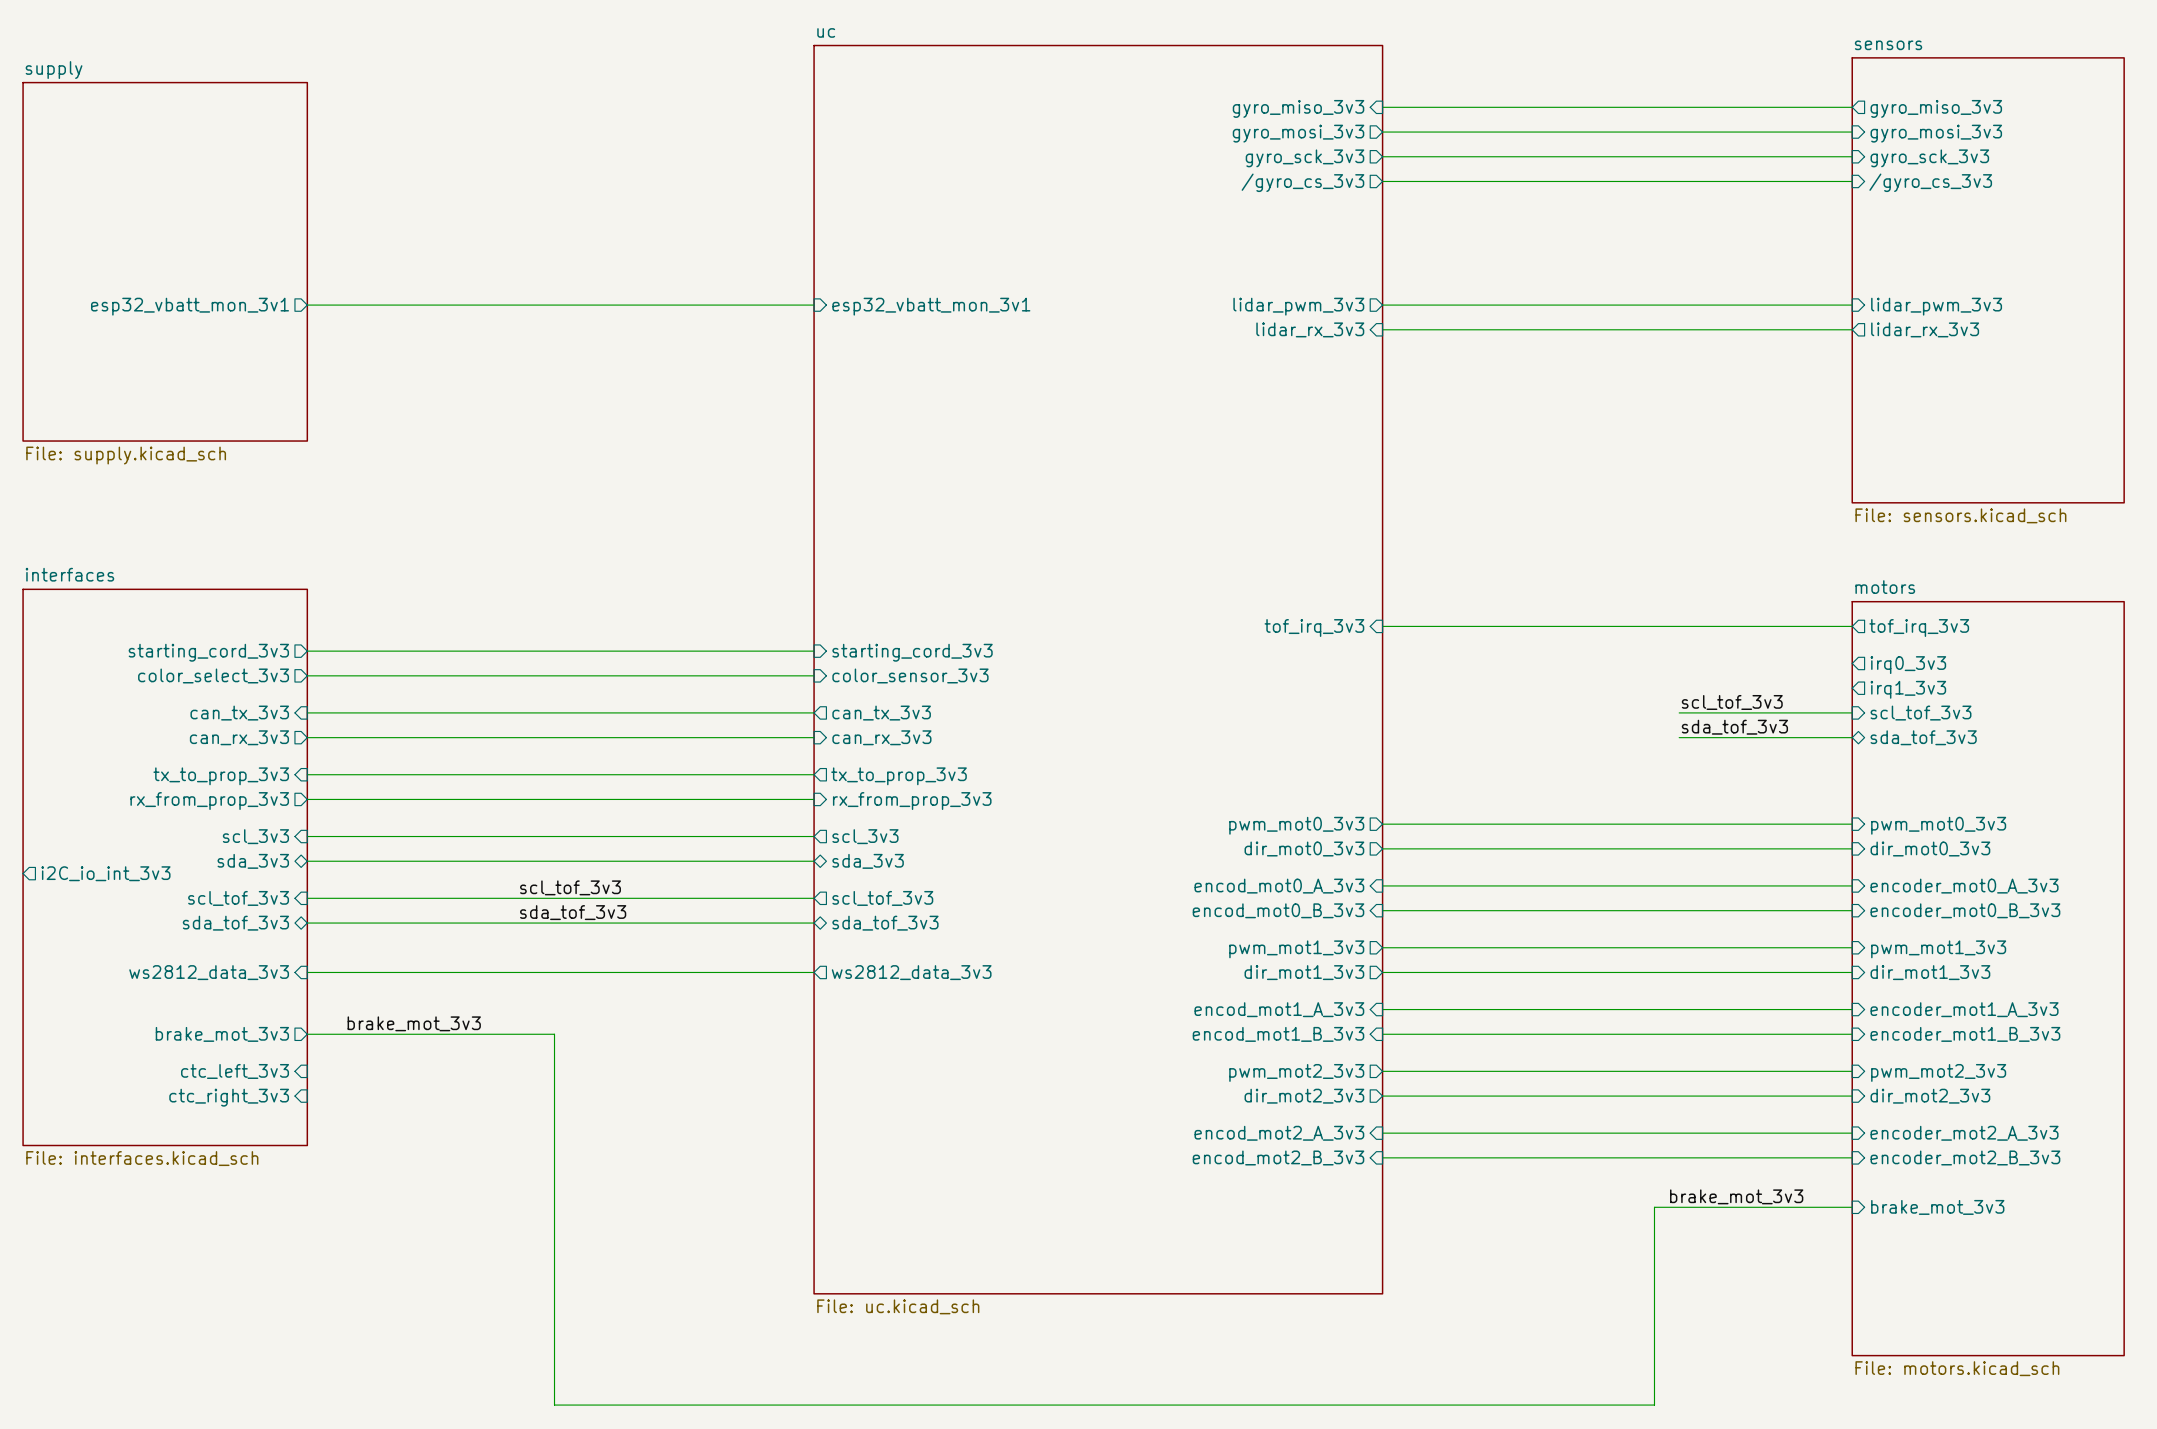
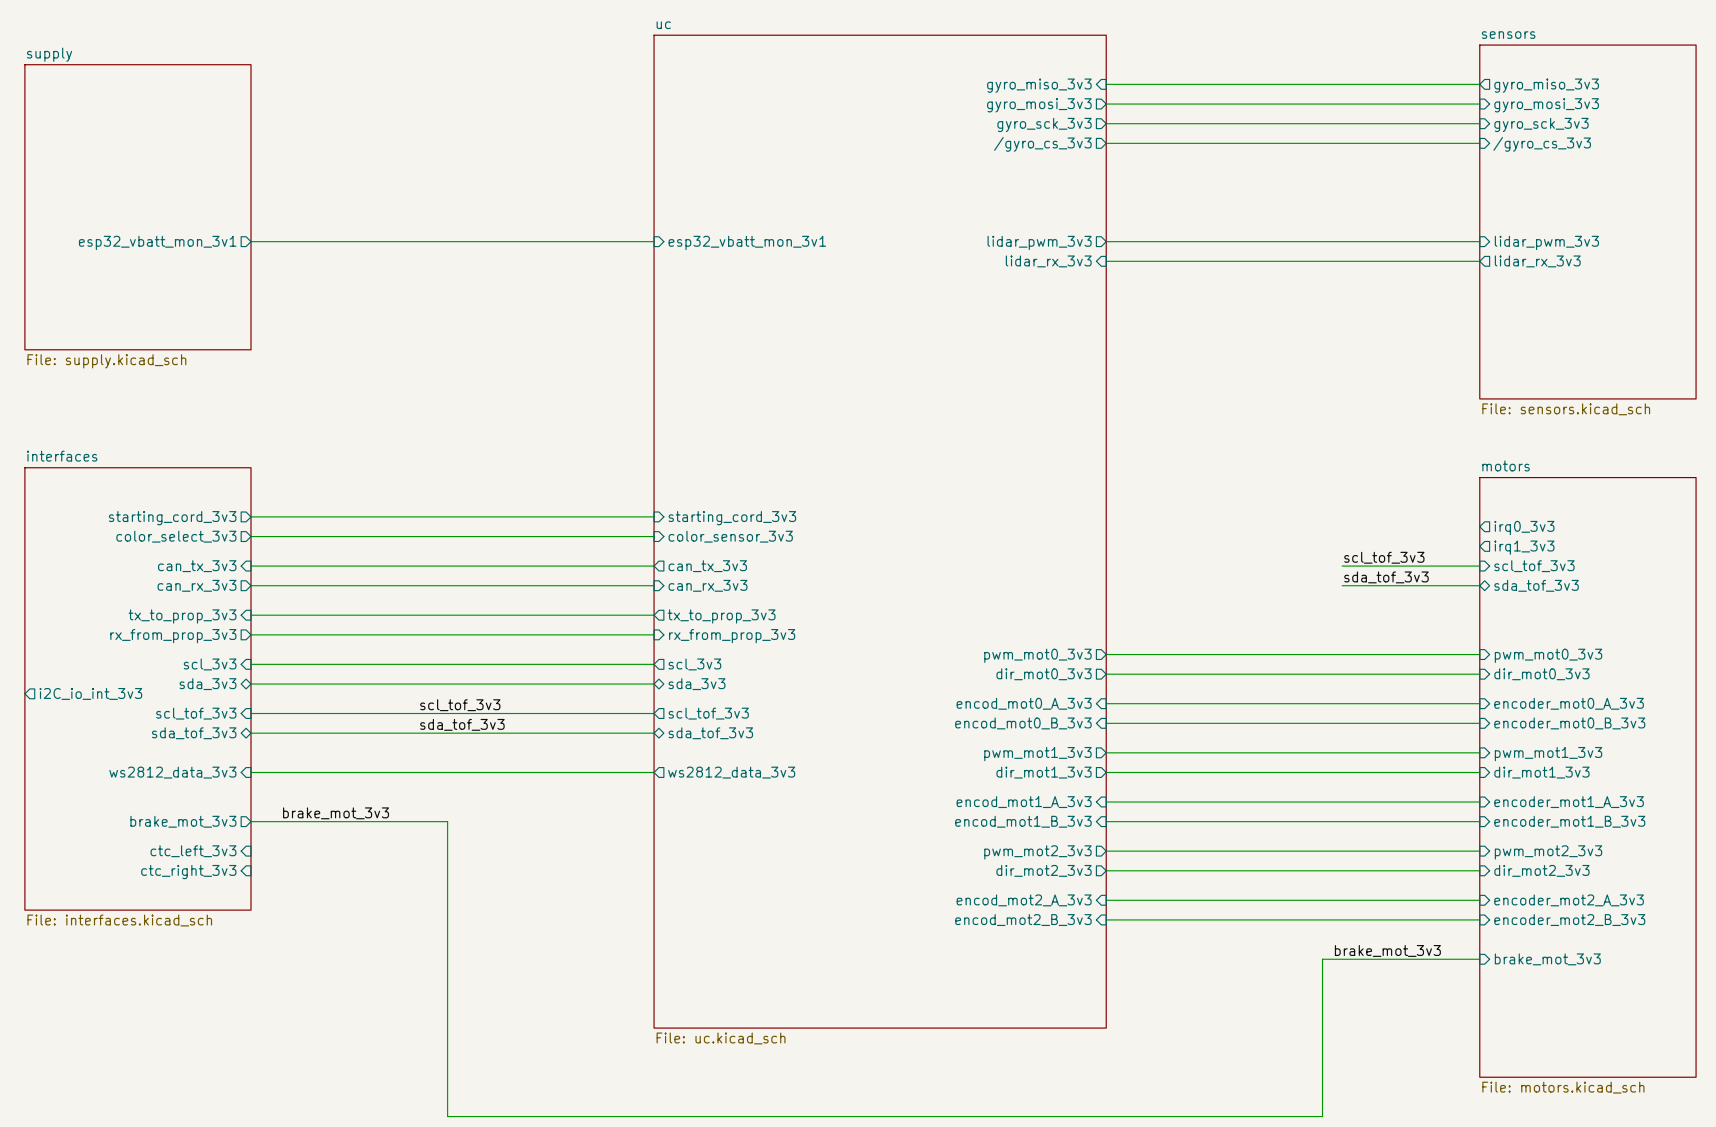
wire: (1382, 626) (1852, 626) -> none
sheet pin: tof_irq_3v3 (1314, 628) -> none
sheet pin: tof_irq_3v3 (1919, 628) -> none

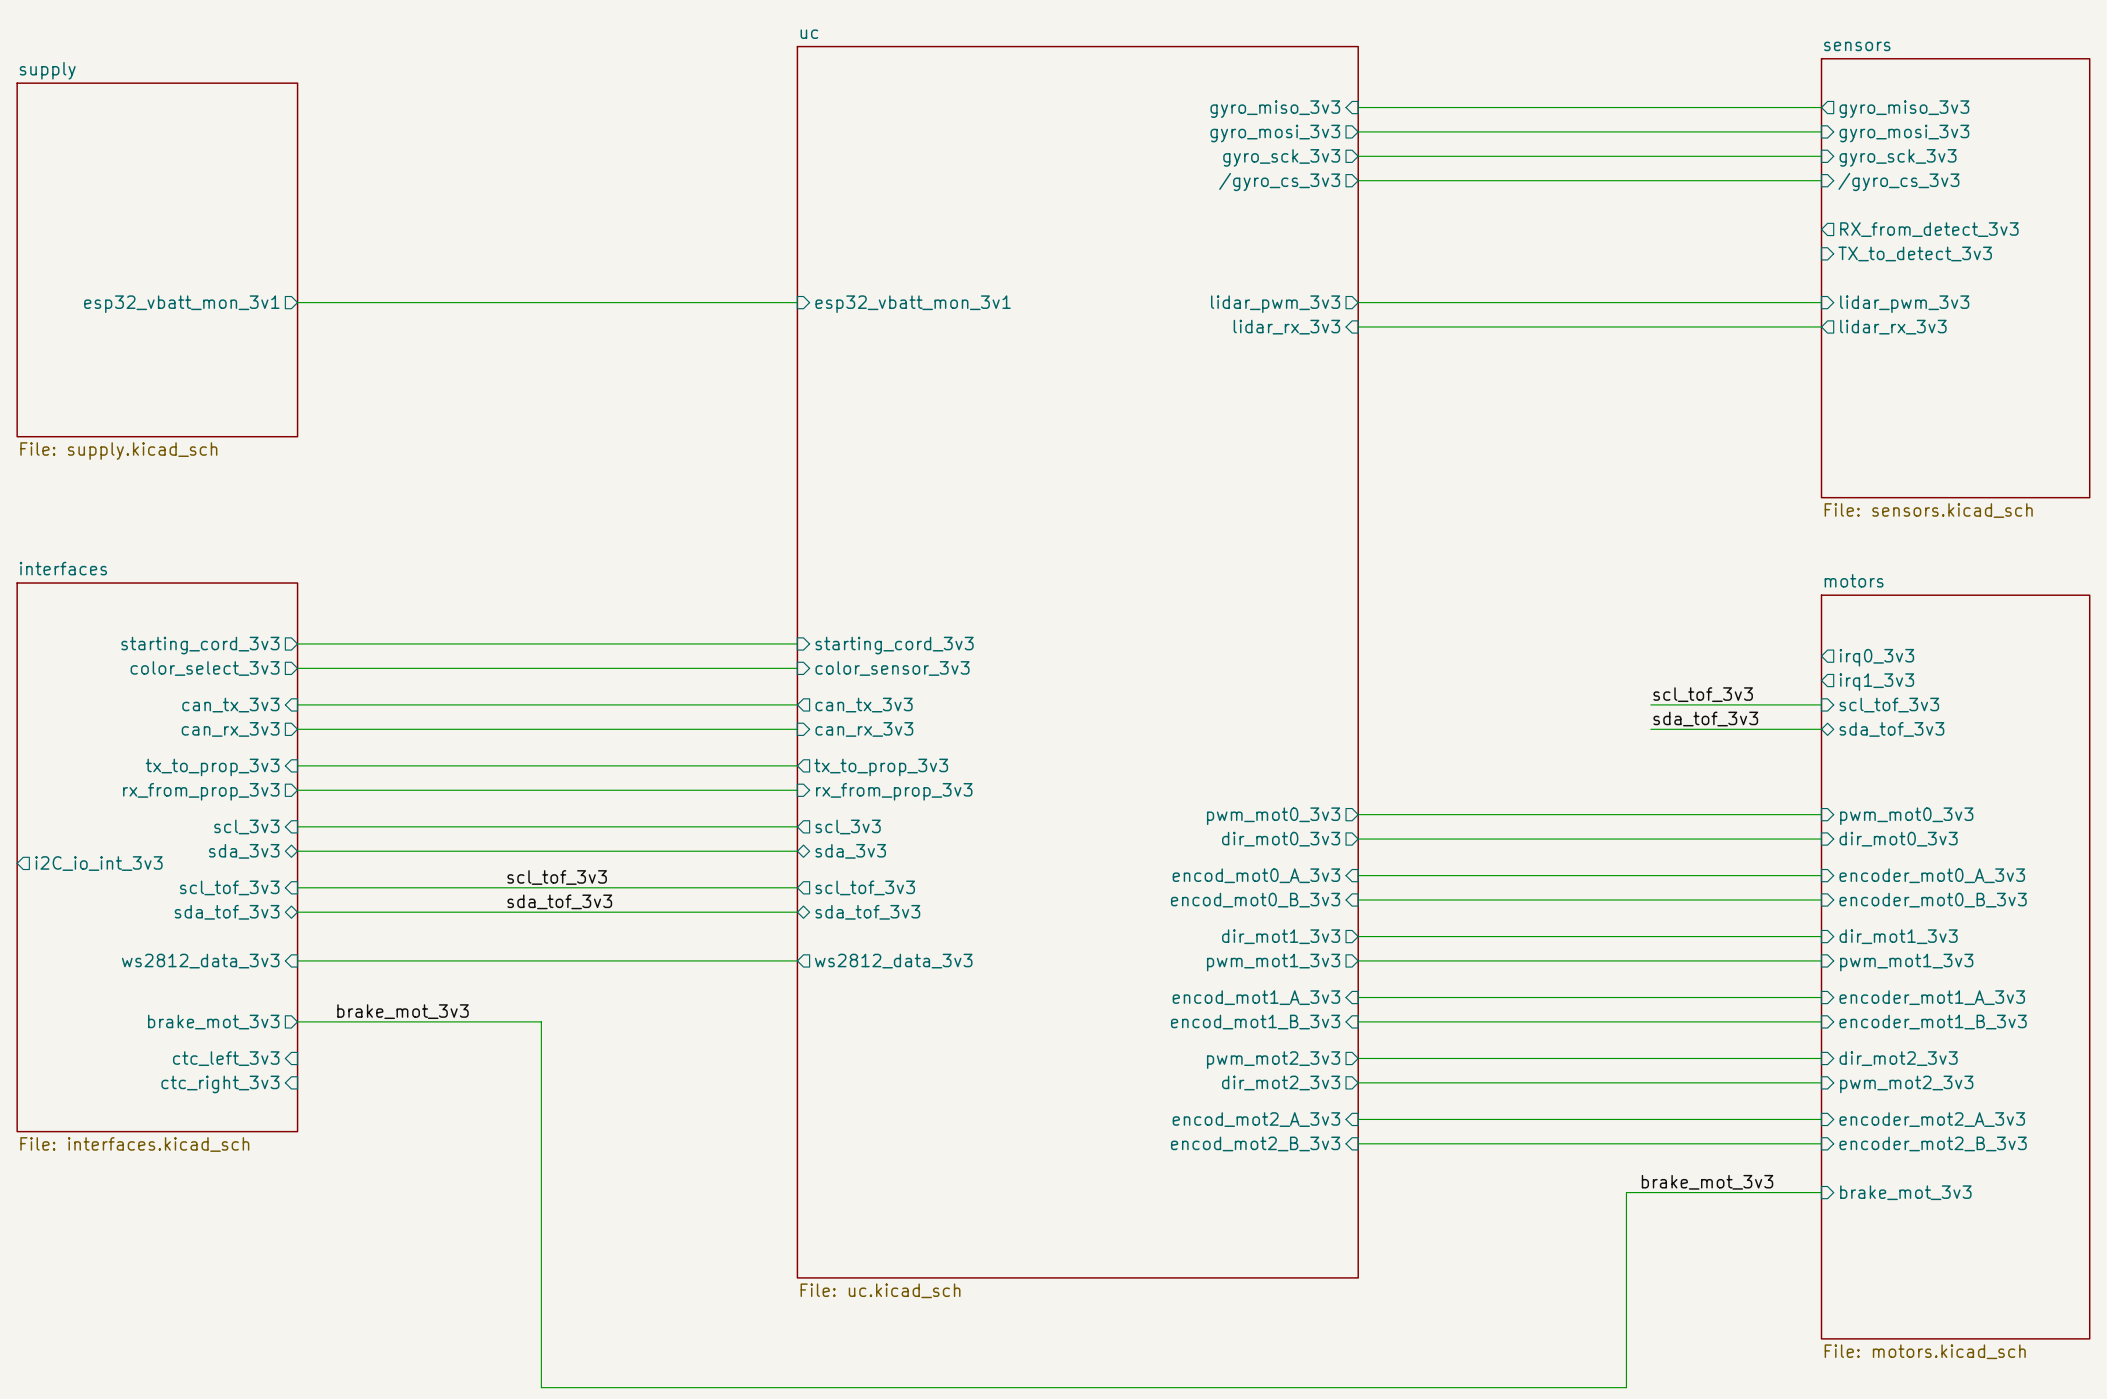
sheet pin: none -> RX_from_detect_3v3 (1929, 229)
sheet pin: none -> TX_to_detect_3v3 (1915, 253)
sheet pin: pwm_mot1_3v3 (1037, 754) -> dir_mot1_3v3 (1281, 936)
sheet pin: pwm_mot1_3v3 (1548, 754) -> dir_mot1_3v3 (1898, 936)
sheet pin: dir_mot1_3v3 (1044, 772) -> pwm_mot1_3v3 (1273, 962)
sheet pin: dir_mot1_3v3 (1541, 772) -> pwm_mot1_3v3 (1906, 962)
sheet pin: pwm_mot2_3v3 (1548, 852) -> dir_mot2_3v3 (1898, 1058)
sheet pin: dir_mot2_3v3 (1541, 870) -> pwm_mot2_3v3 (1906, 1084)

